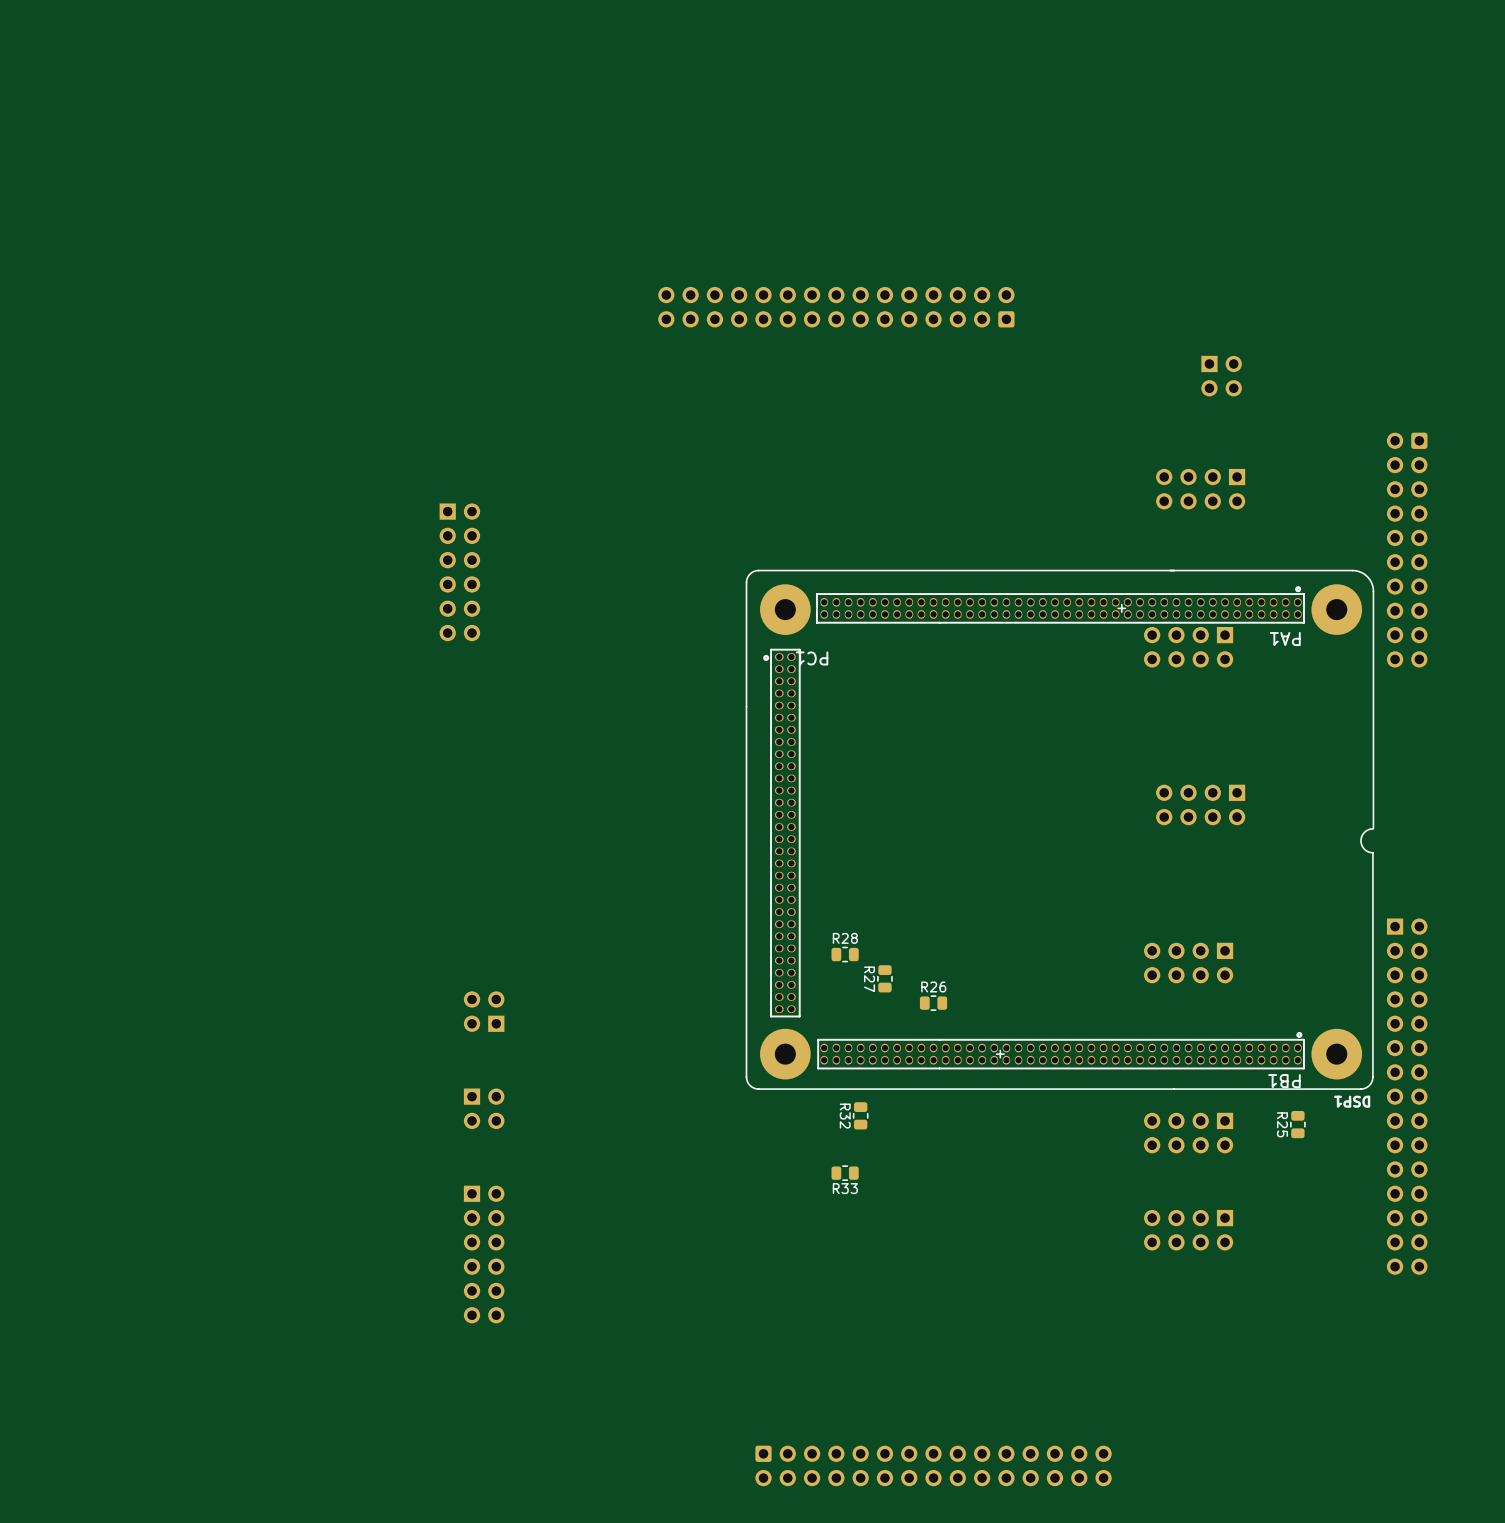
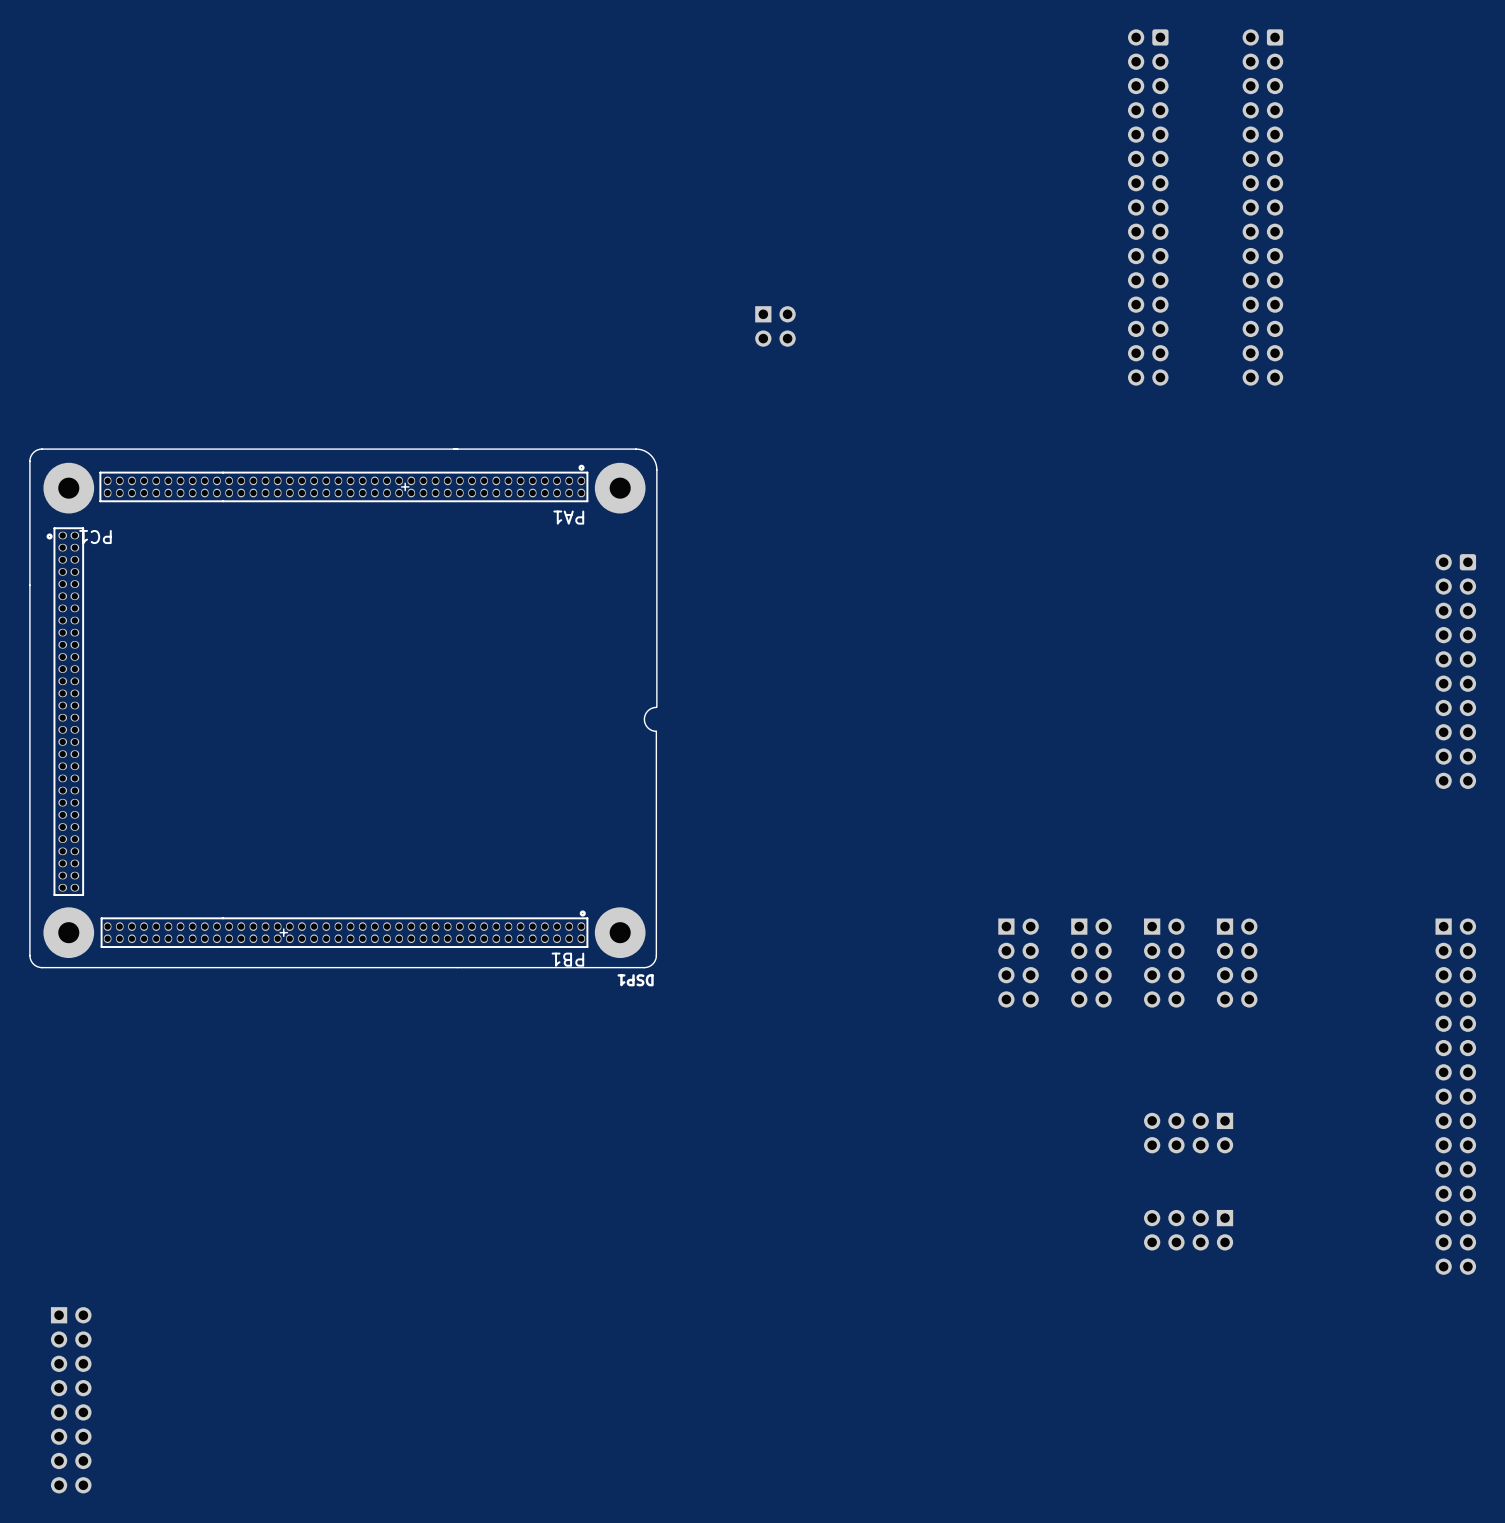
part: none -> (1148, 207)
part: none -> (1262, 207)
part: (836, 307) -> none
part: none -> (775, 326)
part: (1221, 376) -> none
part: (1200, 489) -> none
part position: (1407, 550) -> (1455, 671)
part: (459, 572) -> none
part: (1188, 647) -> none
part: (1200, 804) -> none
DSP1 position: (1059, 829) -> (343, 708)
R28: (845, 954) -> none
part: none -> (1018, 963)
part: none -> (1091, 963)
part: none -> (1164, 963)
part: (1188, 963) -> none
part: none -> (1237, 963)
R27: (884, 978) -> none
R26: (933, 1003) -> none
part: (484, 1011) -> none
part position: (1407, 1096) -> (1455, 1096)
part: (484, 1108) -> none
R32: (860, 1115) -> none
R25: (1297, 1124) -> none
R33: (845, 1173) -> none
part: (484, 1254) -> none
part: none -> (71, 1400)
part: (933, 1465) -> none

